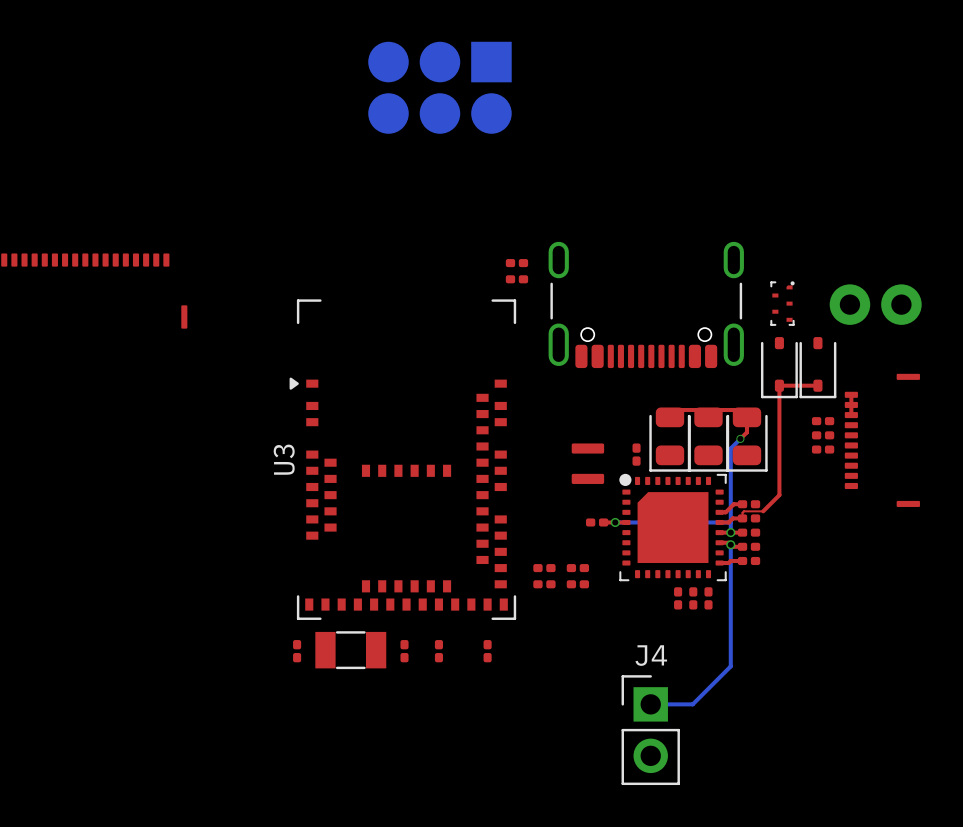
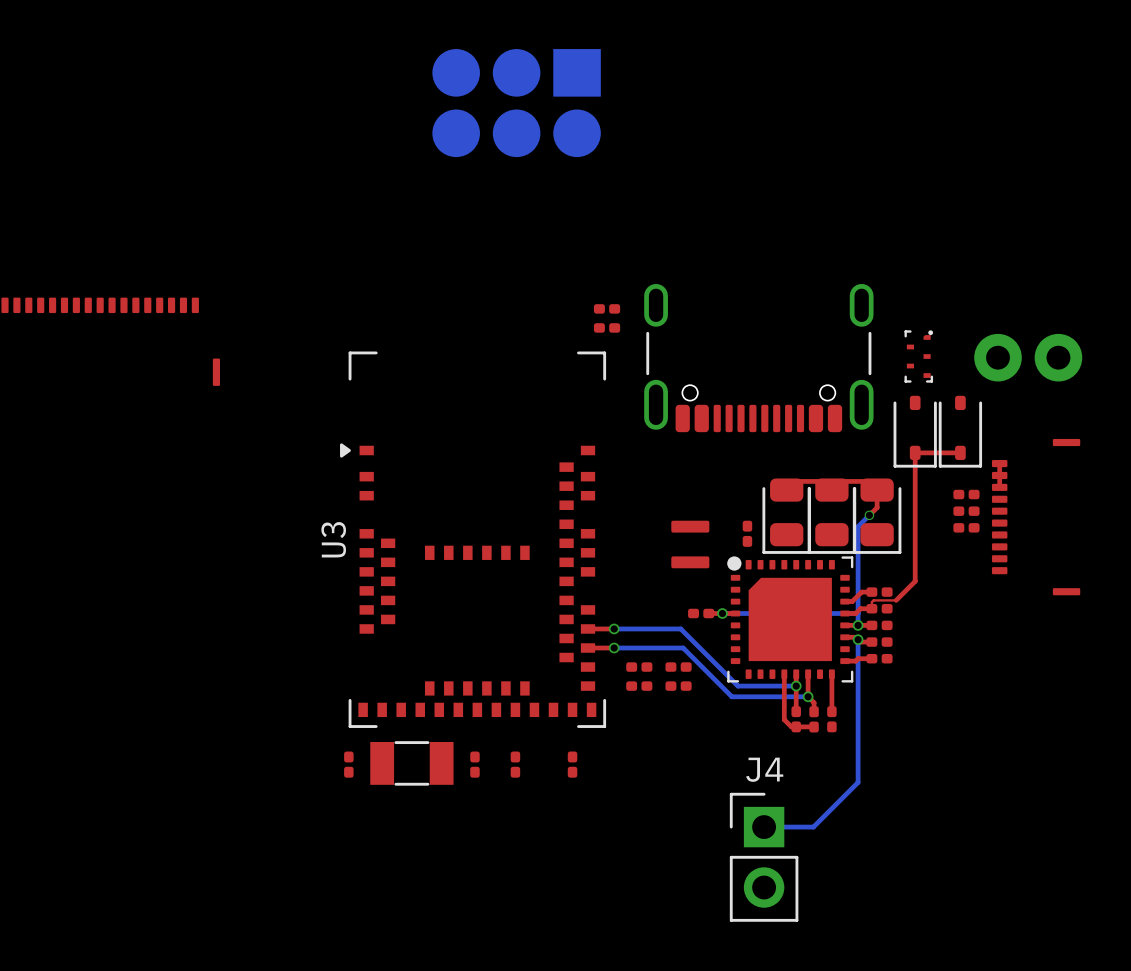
top track: none -> (588, 628) (614, 628)
bottom track: none -> (614, 628) (680, 628) (737, 686) (796, 686)
via: none -> (614, 628)
top track: none -> (588, 648) (614, 648)
bottom track: none -> (614, 648) (683, 648) (731, 696) (808, 696)
via: none -> (614, 648)
top track: none -> (784, 674) (784, 719) (791, 726) (814, 726)
top track: none -> (796, 674) (796, 711)
top track: none -> (808, 674) (808, 696) (814, 702) (814, 711)
top track: none -> (831, 674) (831, 711)
via: none -> (796, 686)
via: none -> (808, 696)
part: (678, 598) -> none
part: (693, 598) -> none
part: (708, 598) -> none
part: none -> (796, 719)
part: none -> (814, 719)
part: none -> (831, 719)

